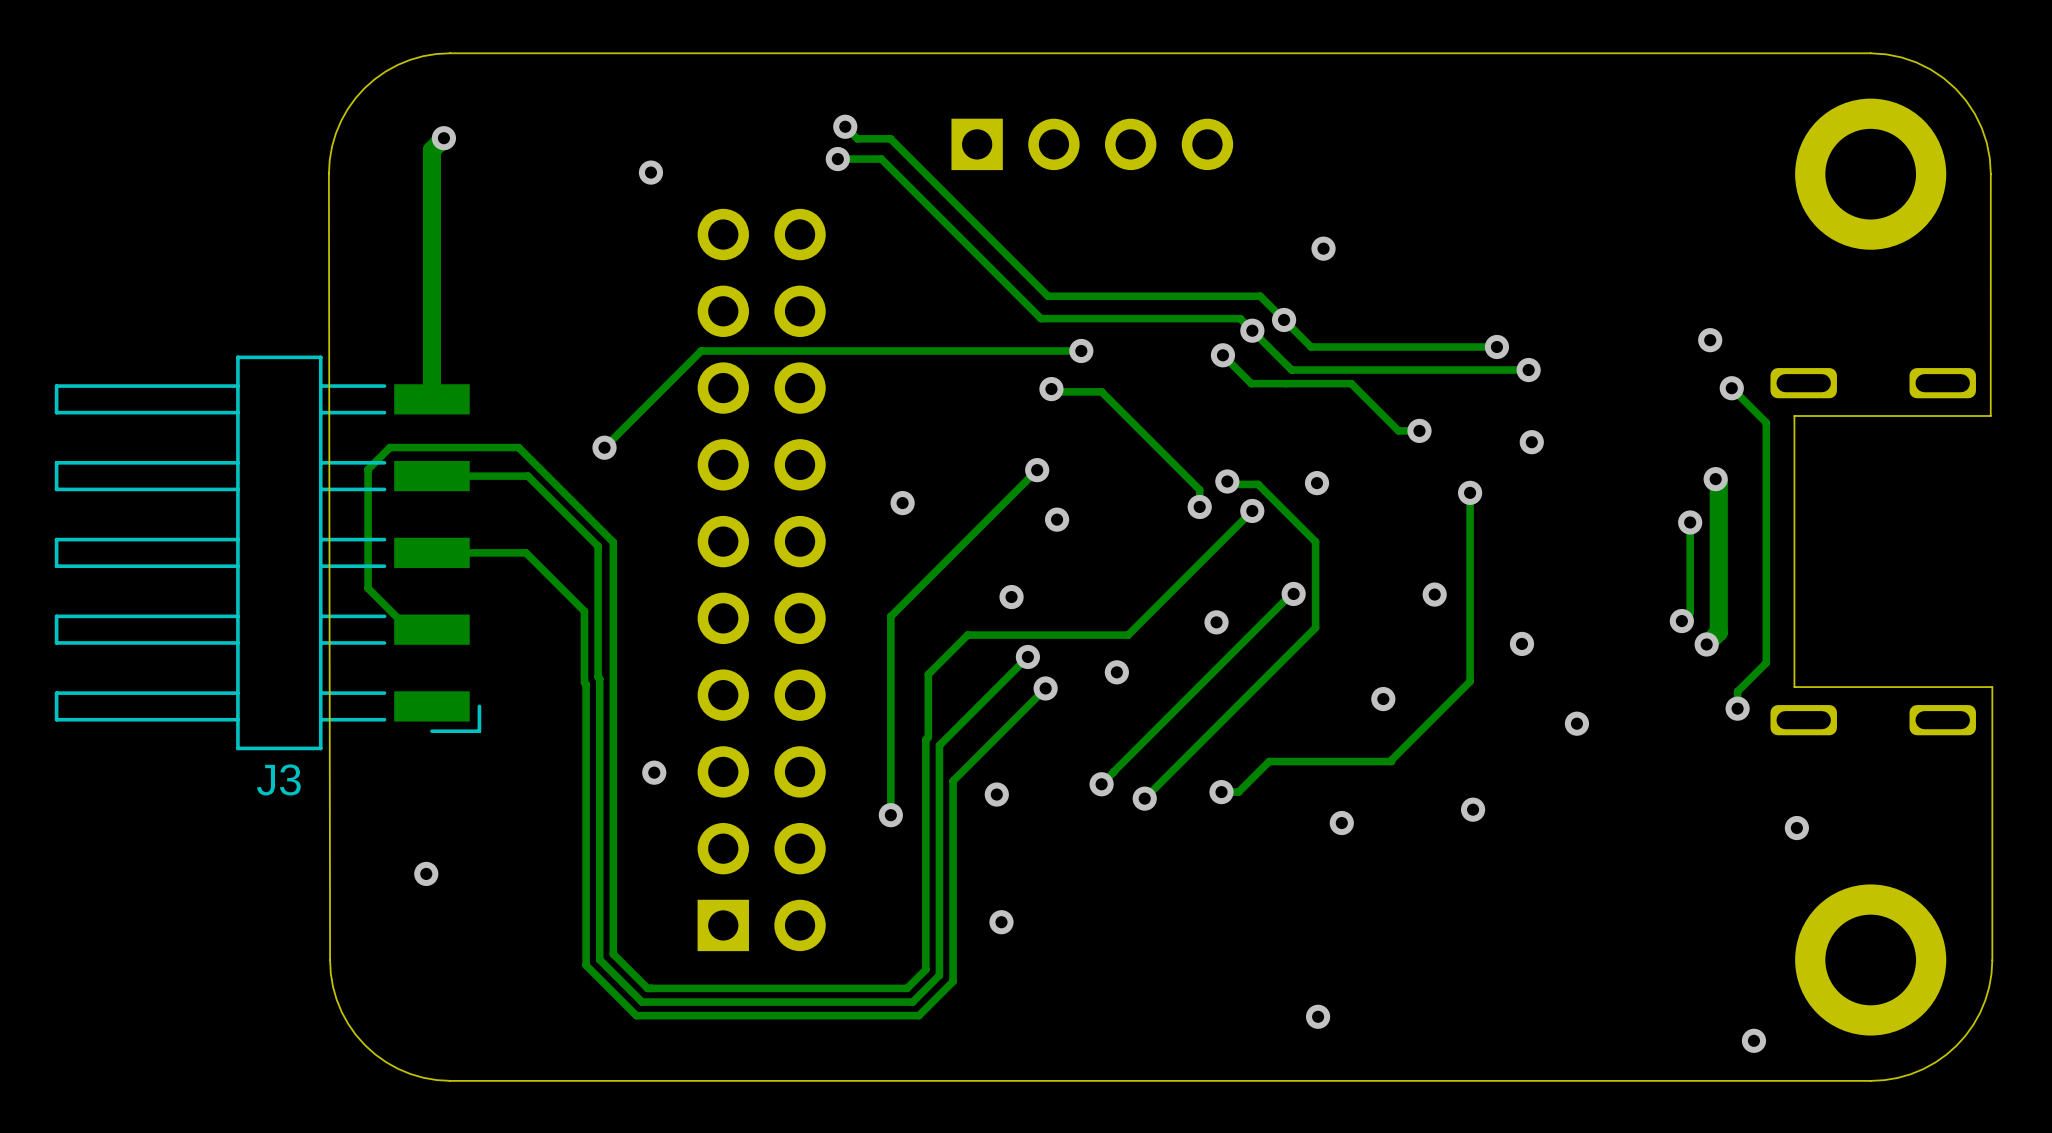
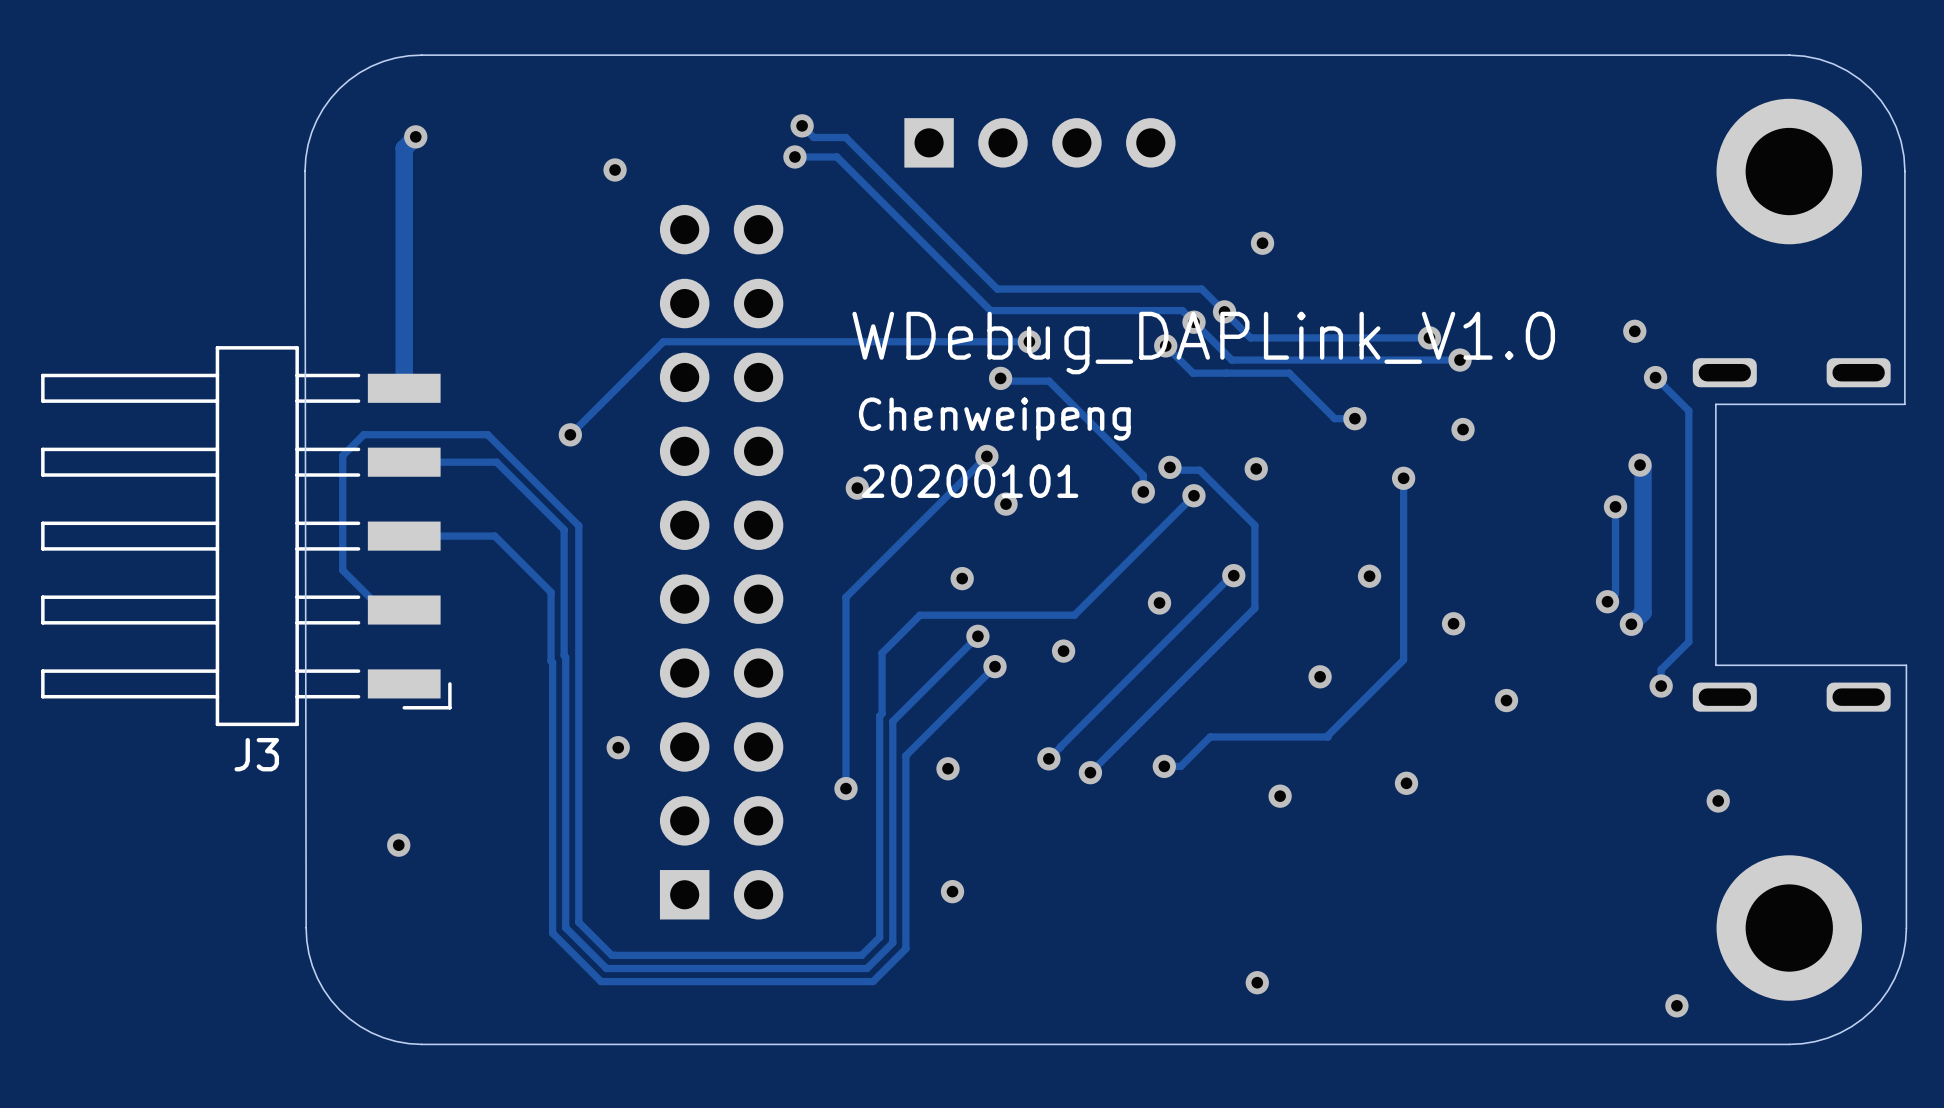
text: none -> WDebug_DAPLink_V1.0 (1203, 343)
text: none -> Chenweipeng (994, 419)
text: none -> 20200101 (970, 481)

